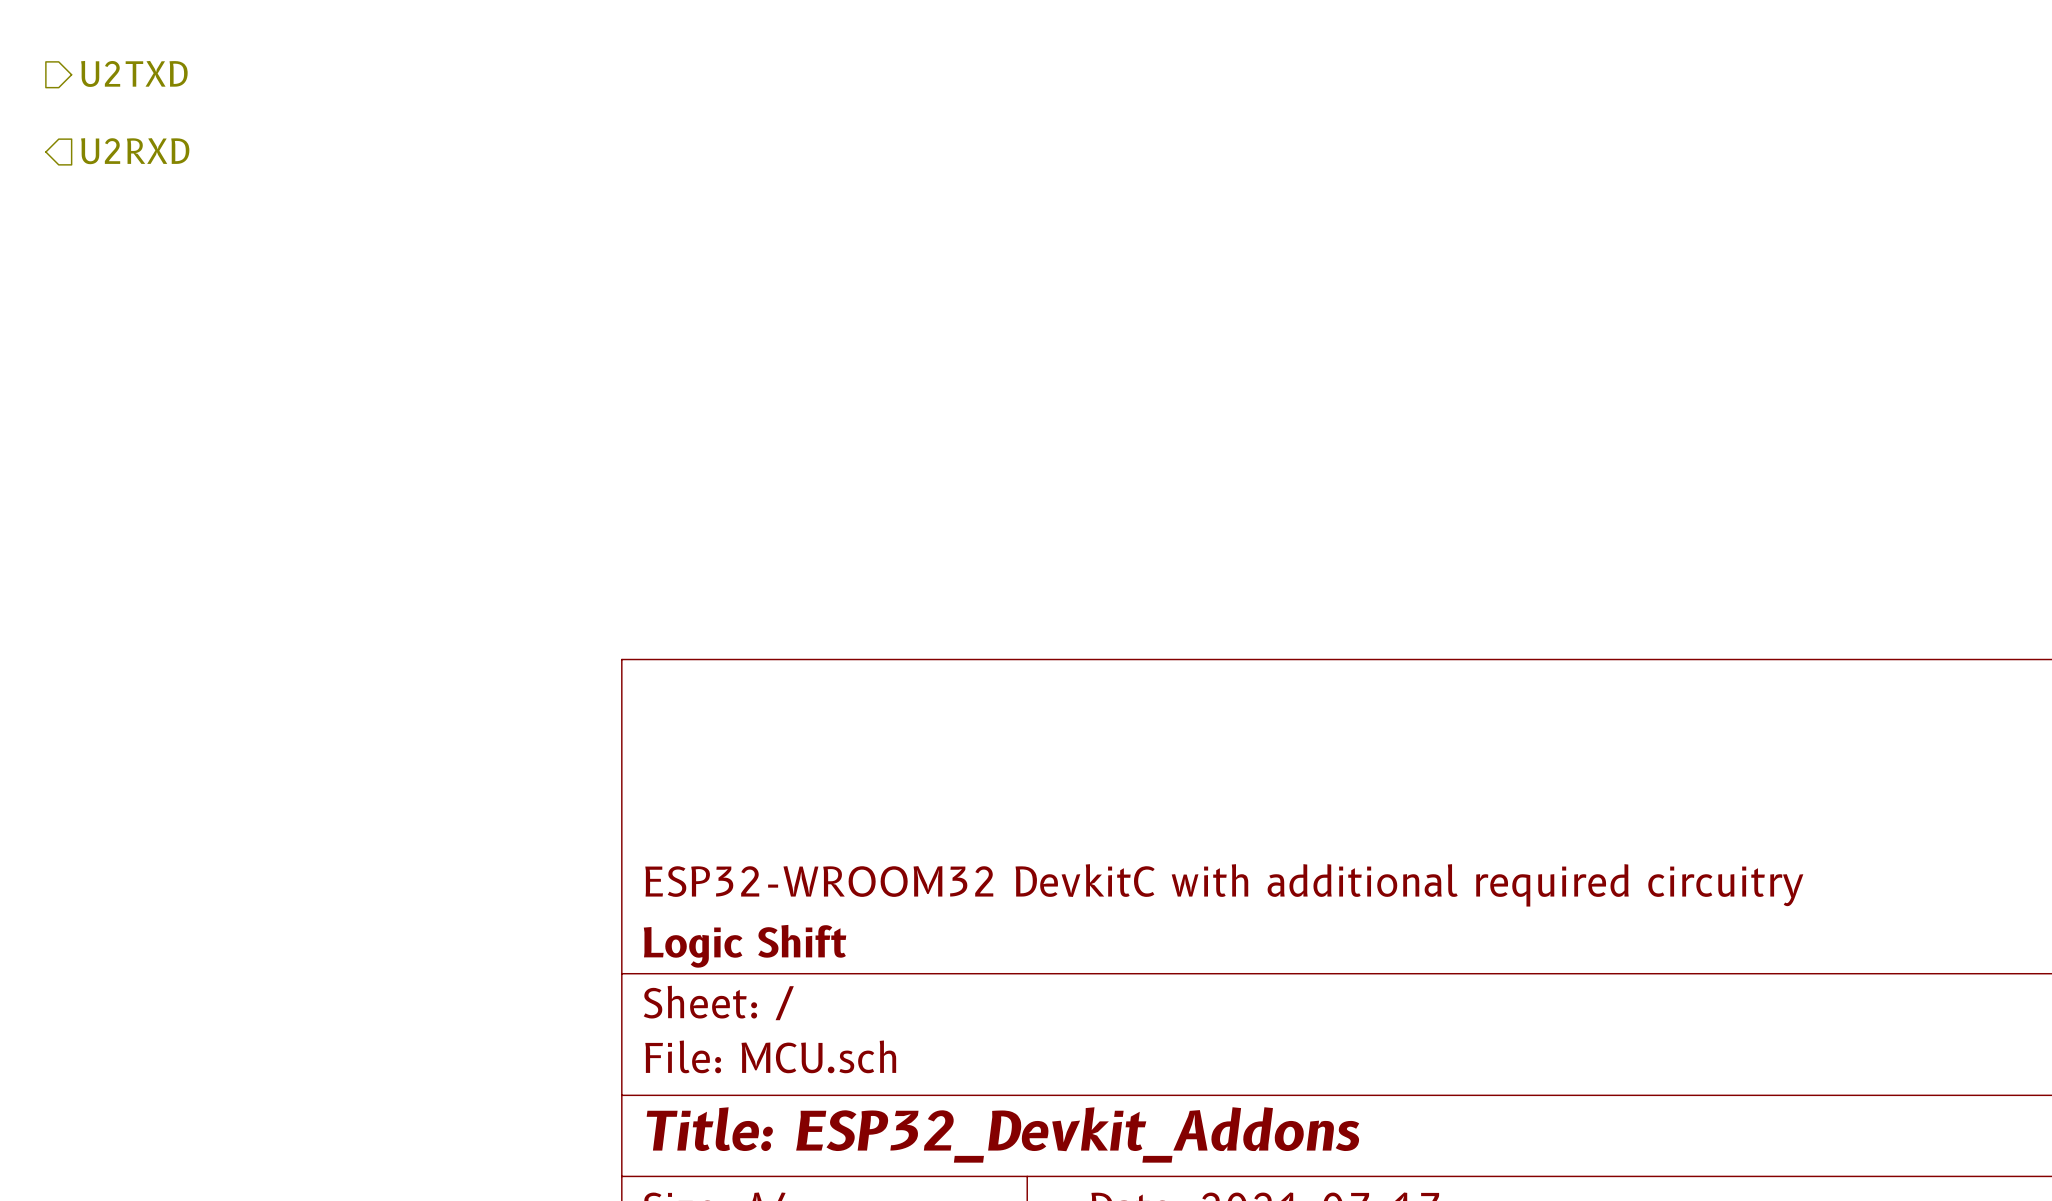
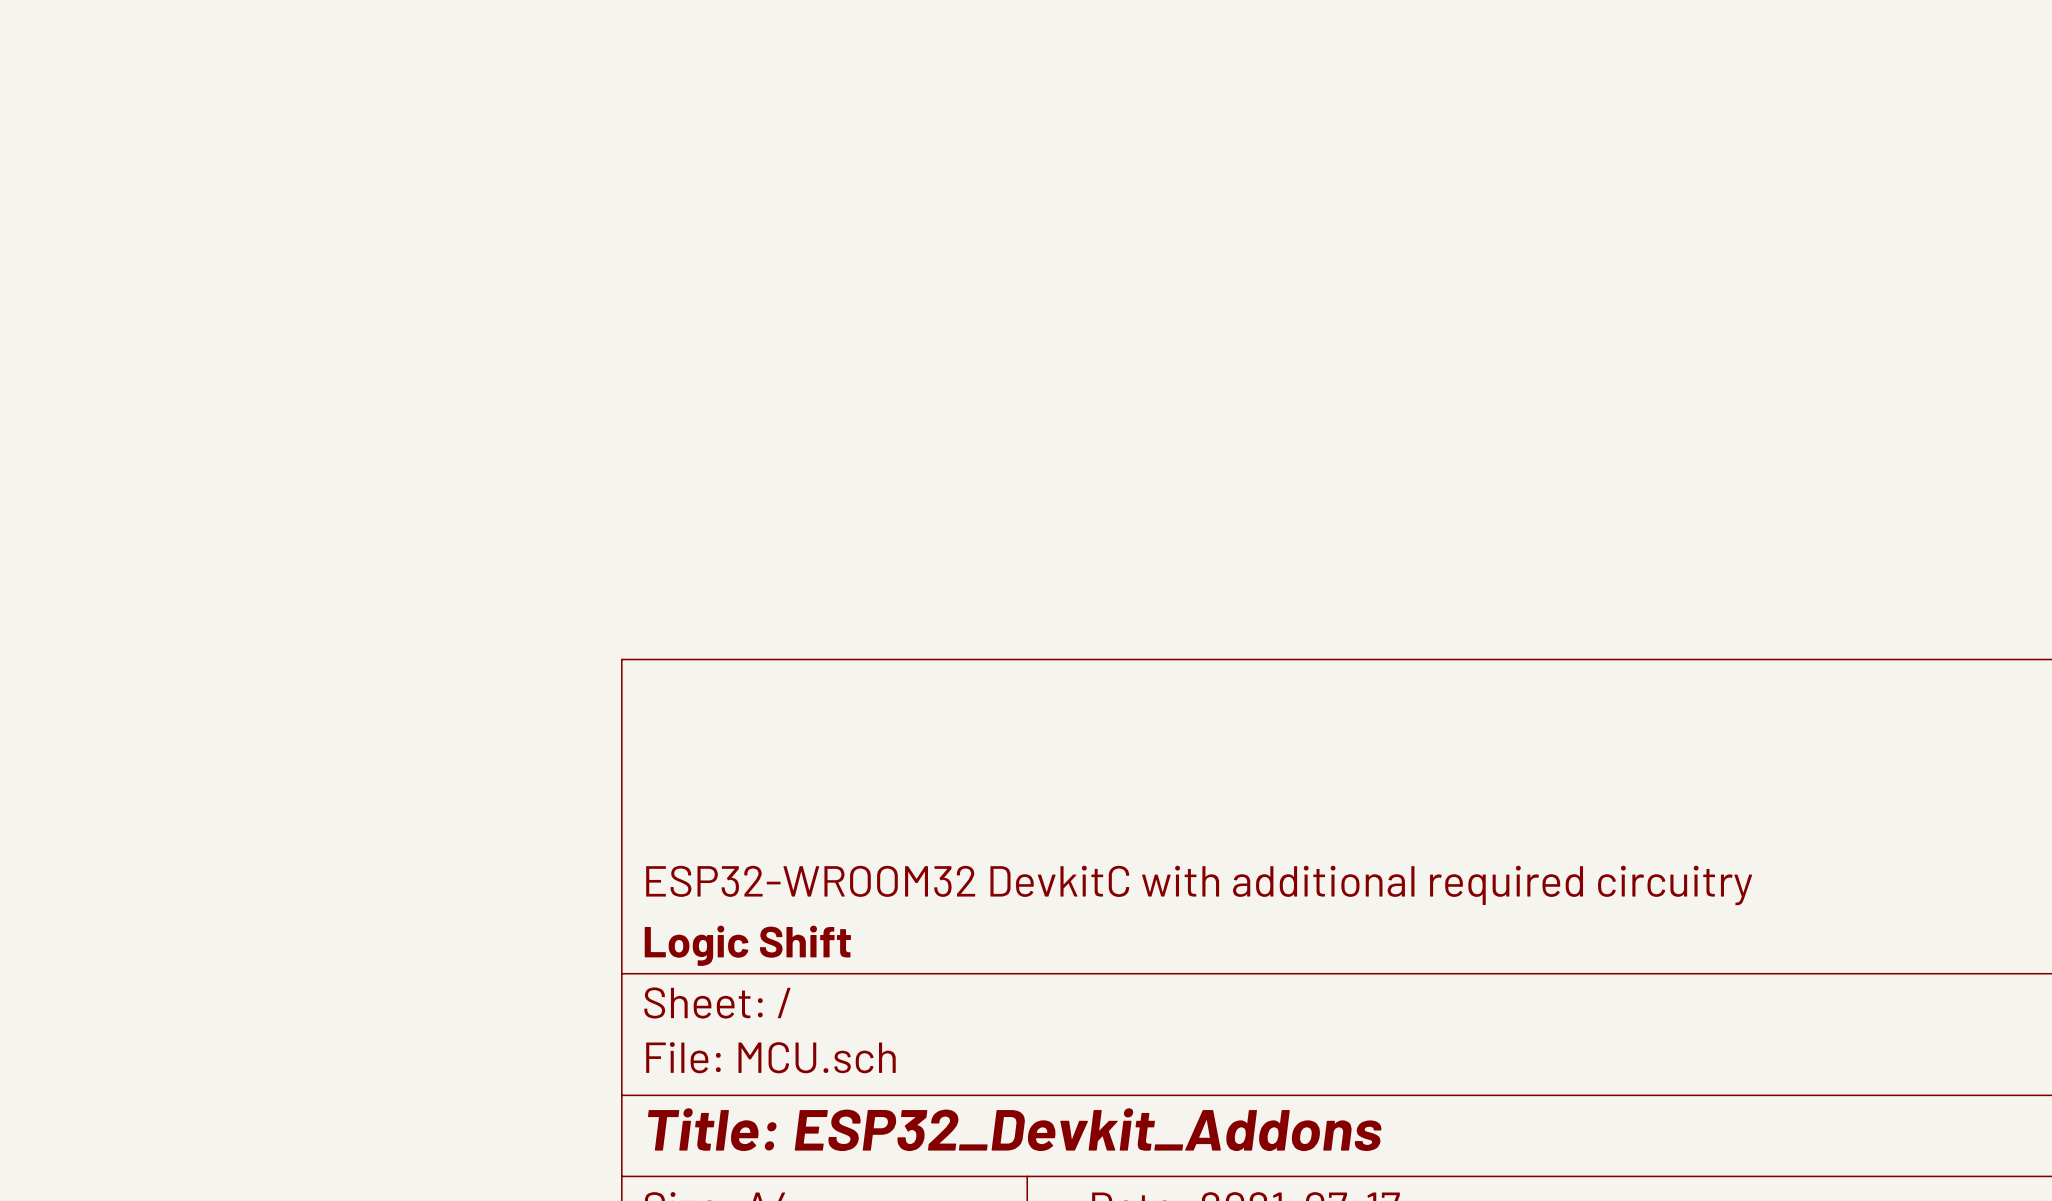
hierarchical label: U2TXD (134, 73) -> none
hierarchical label: U2RXD (135, 151) -> none

